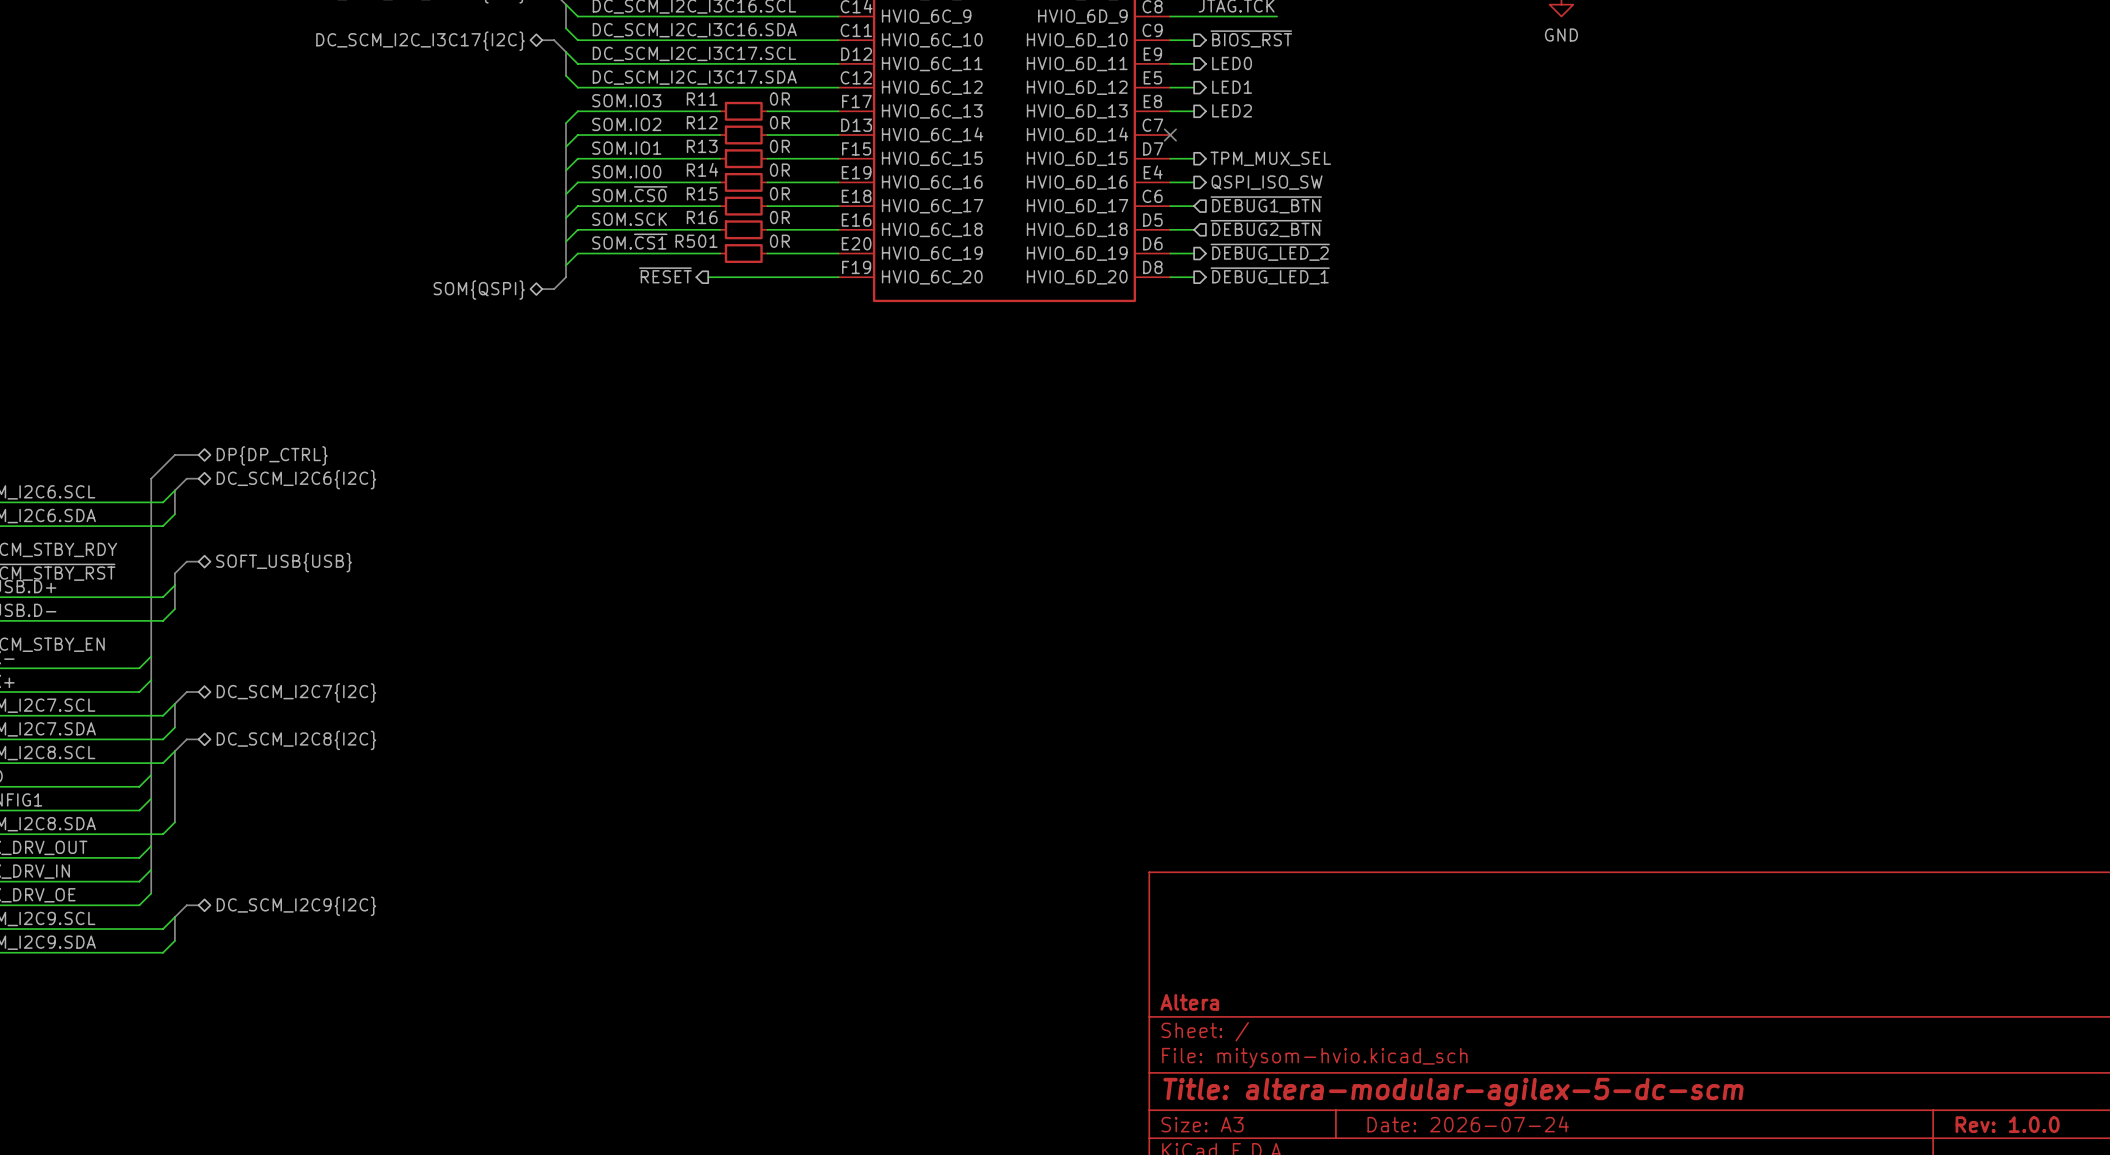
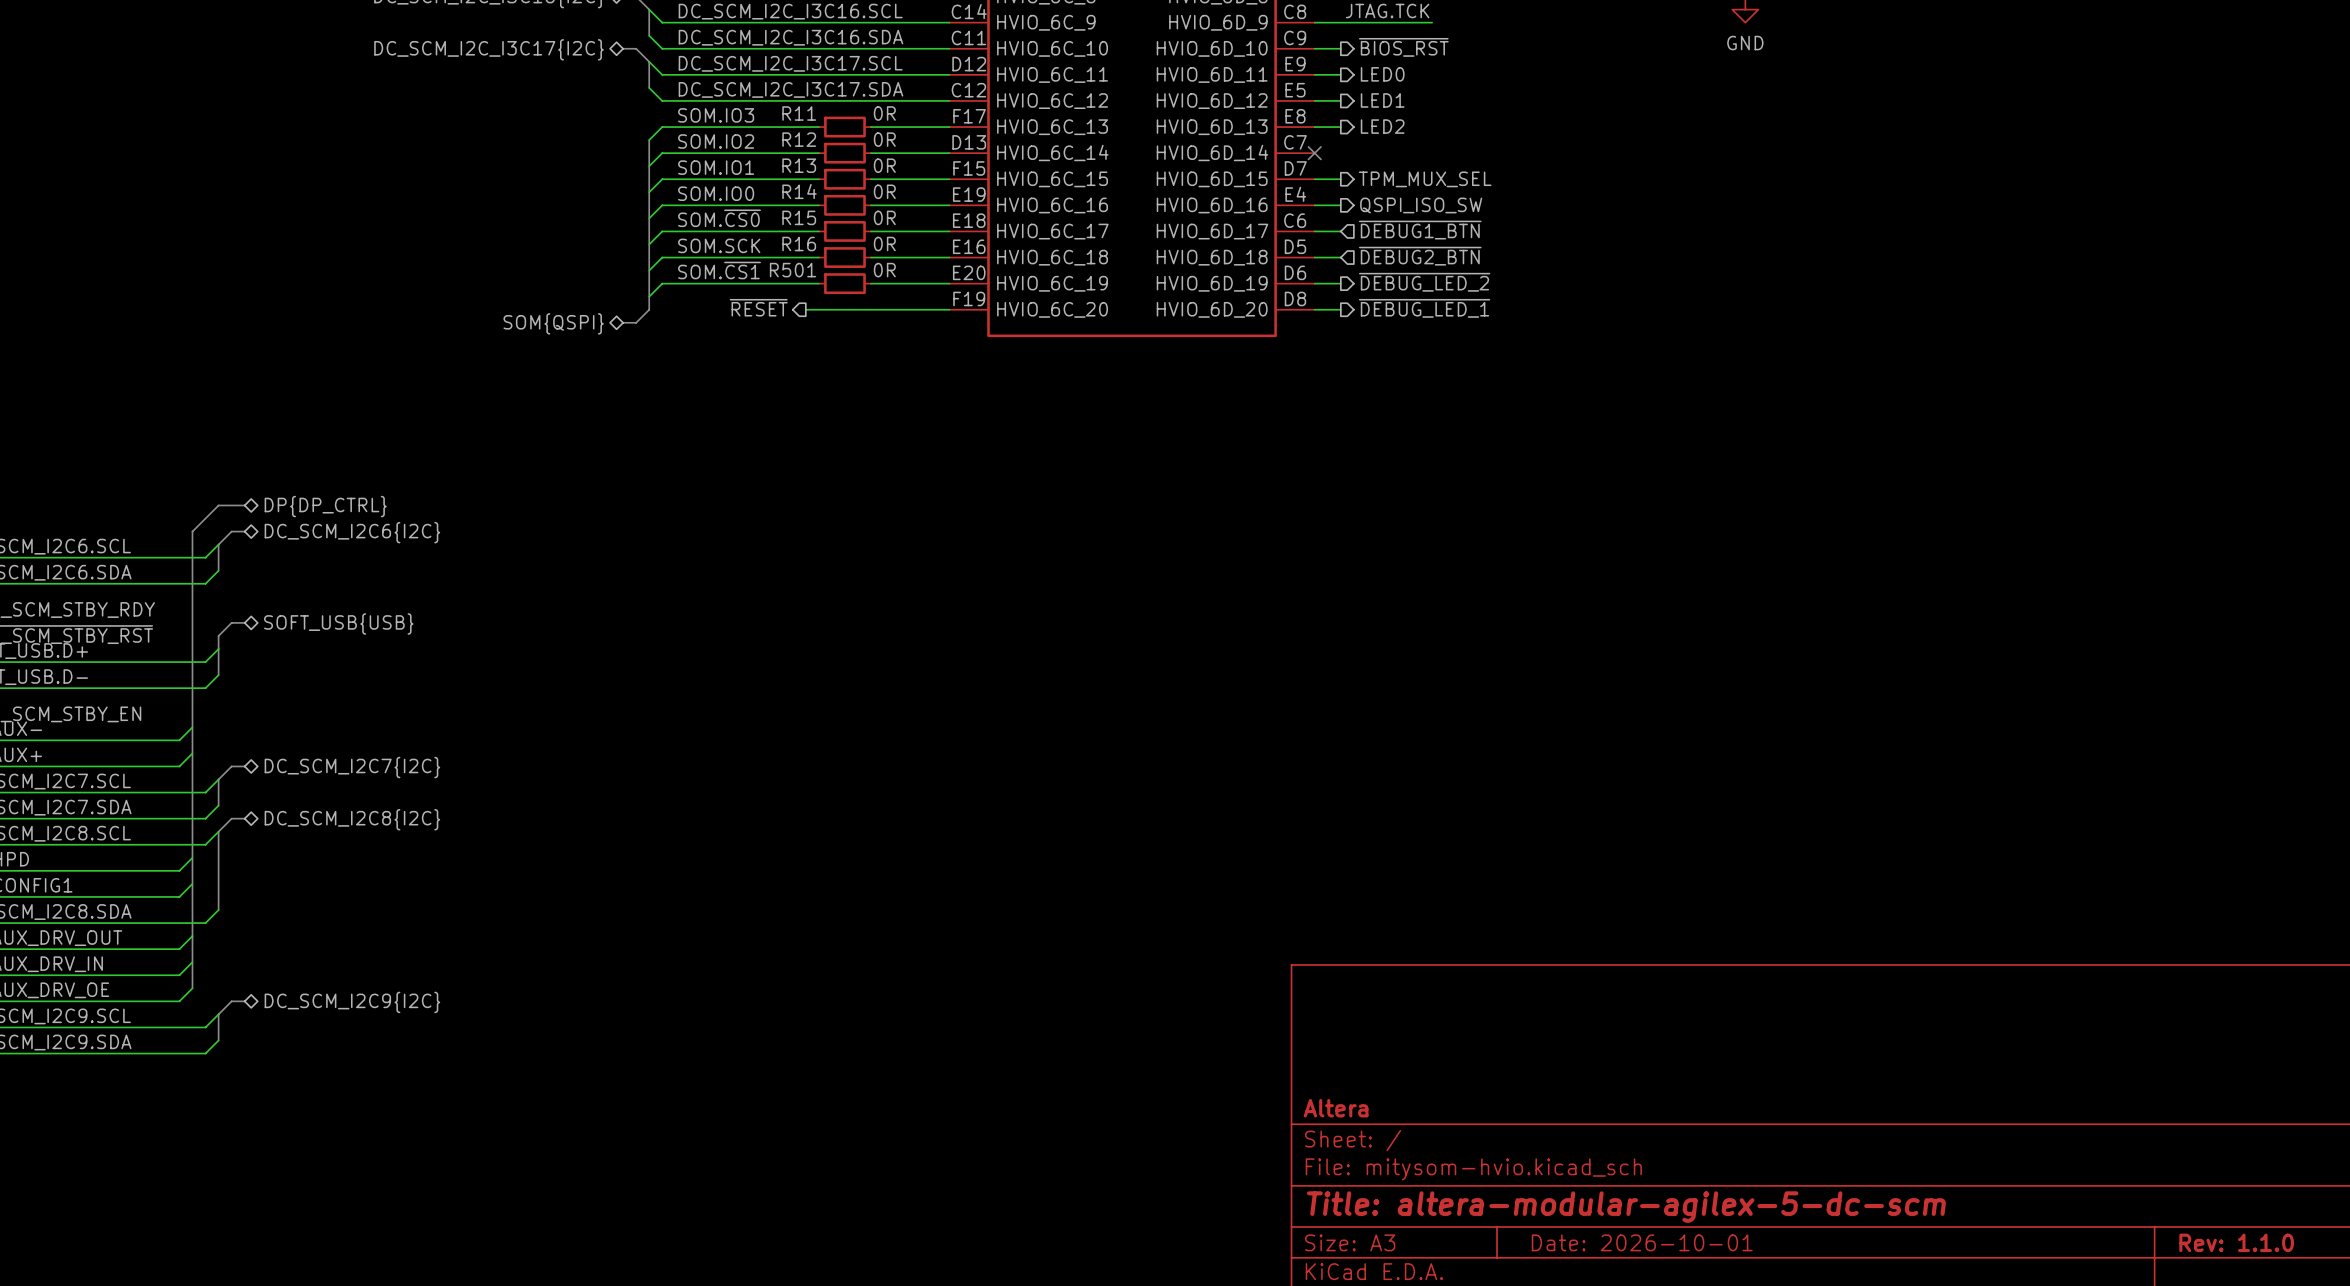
title block: Date: 2026-07-24 (1468, 1124) -> Date: 2026-10-01 (1642, 1242)
title block: Rev: 1.0.0 (2007, 1124) -> Rev: 1.1.0 (2236, 1242)

